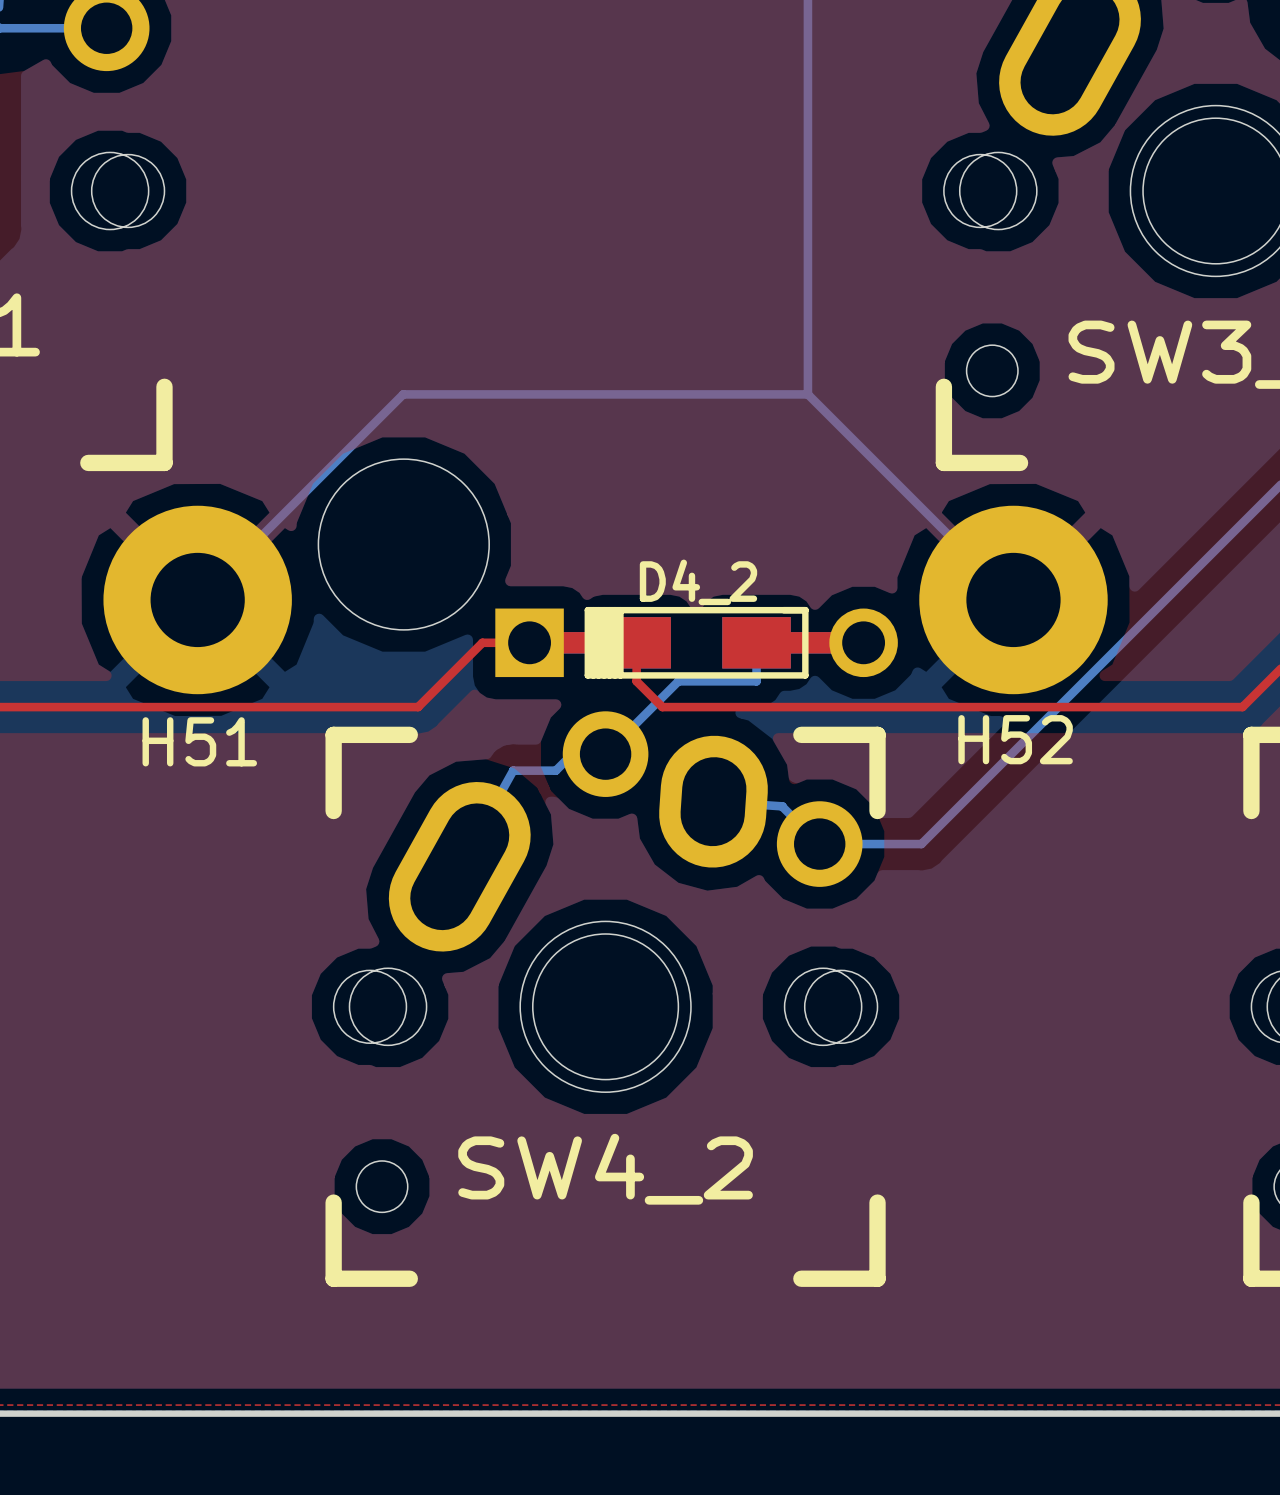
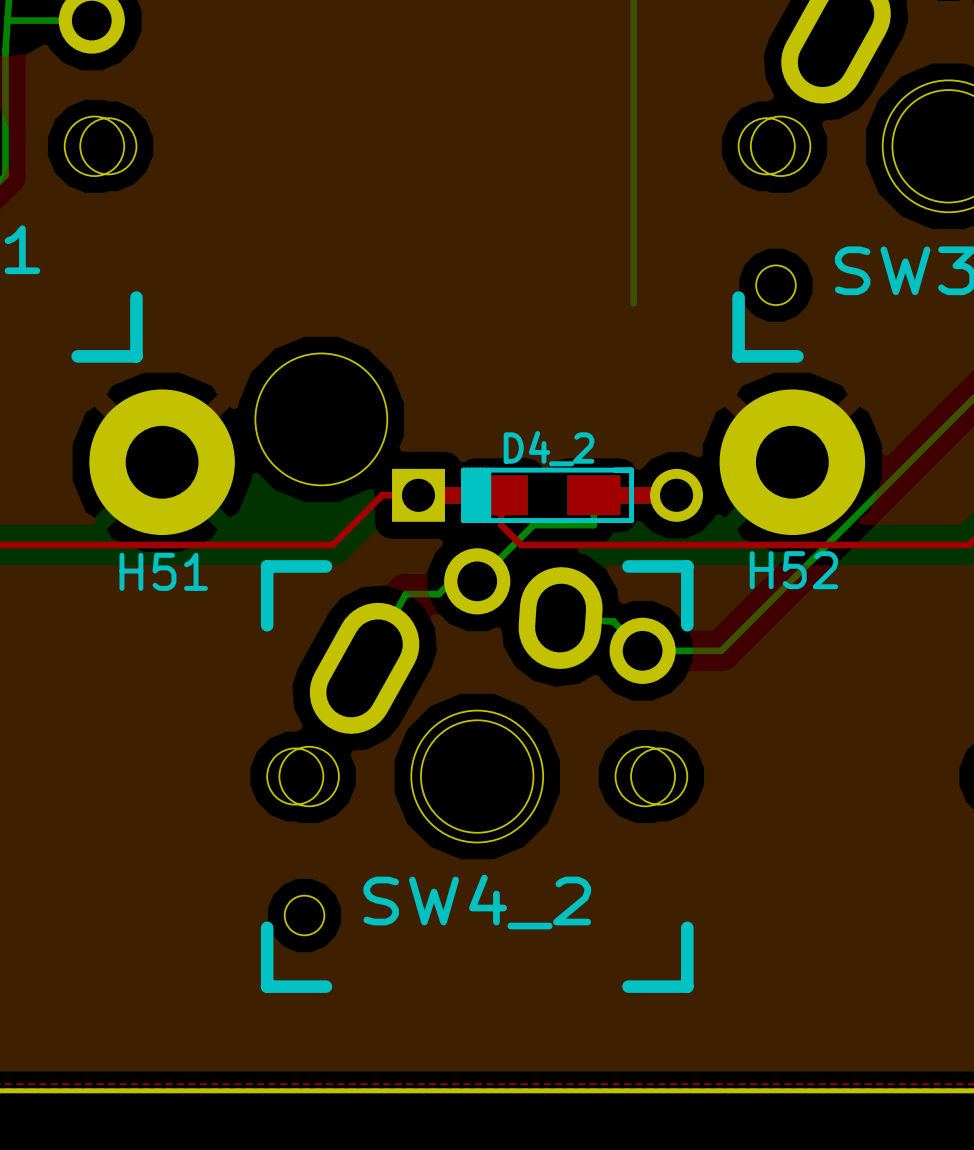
bottom track: (197, 599) (403, 394) (807, 394) (1013, 599) -> none

